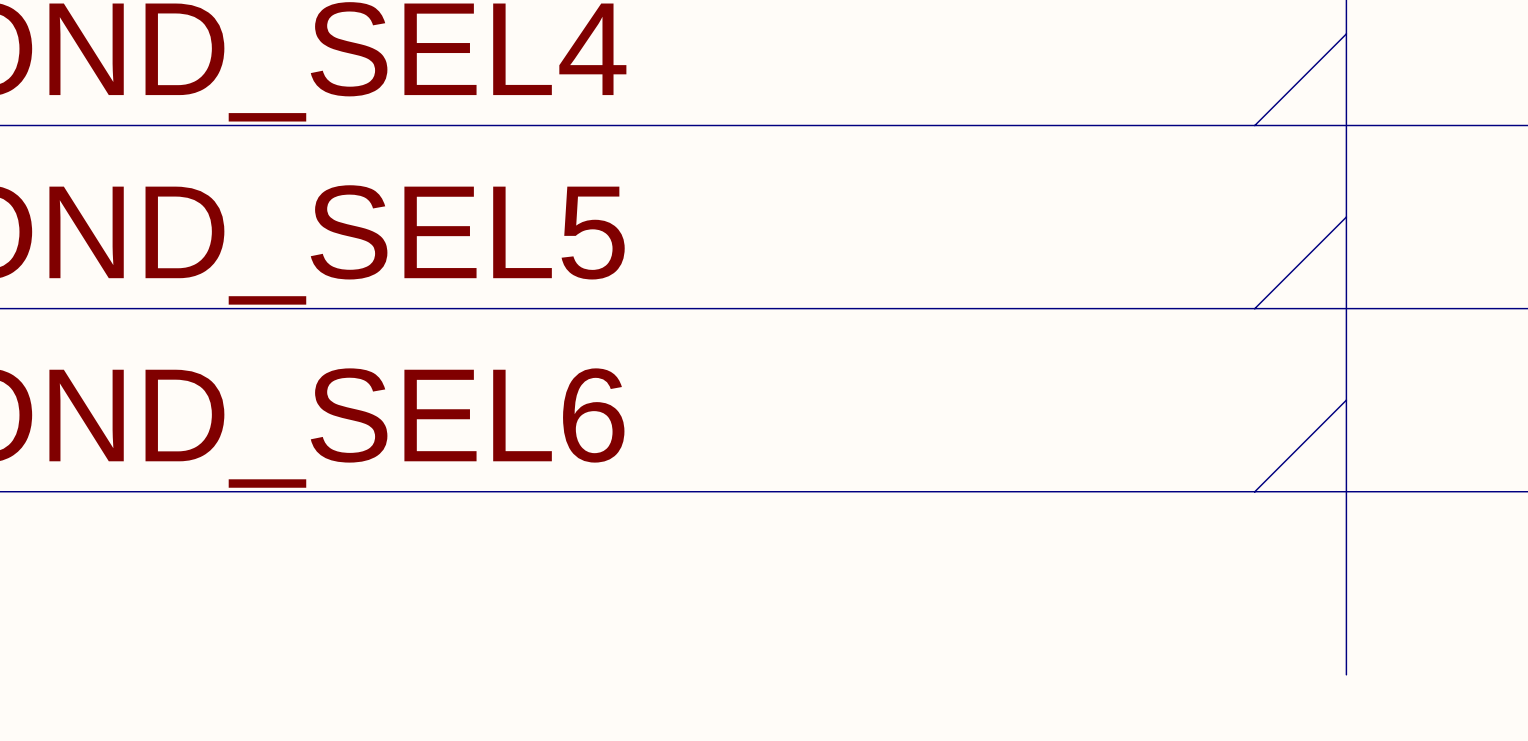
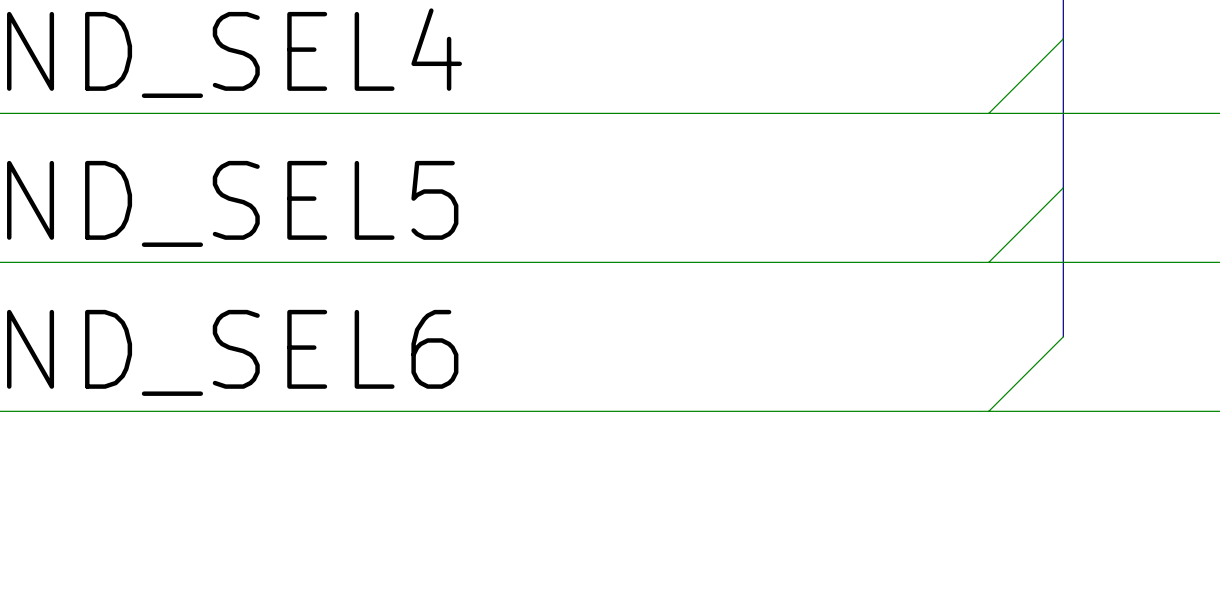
bus: (1346, 400) (1346, 674) -> none

